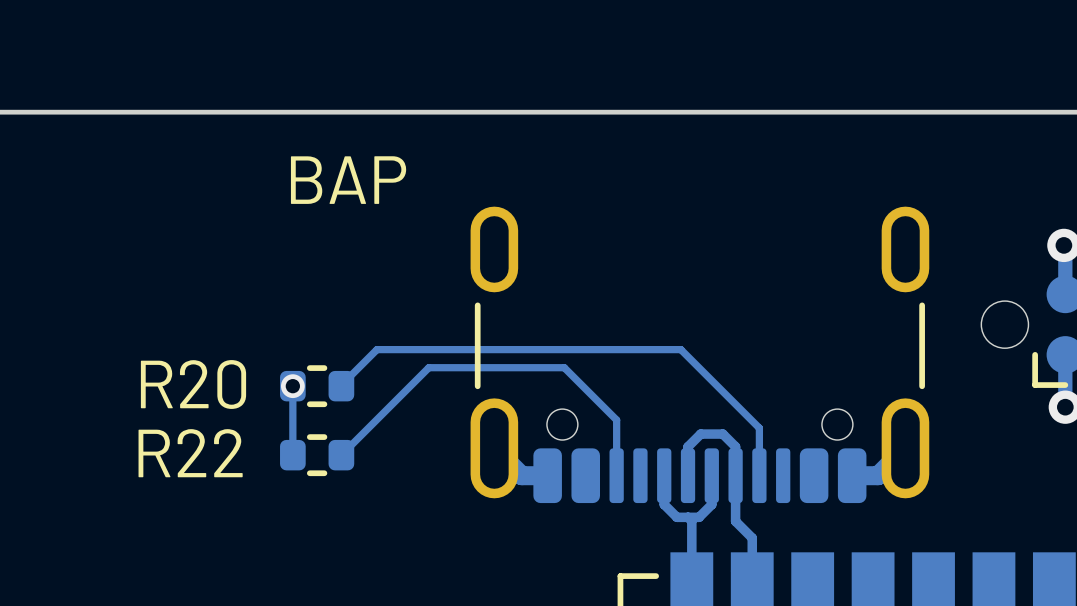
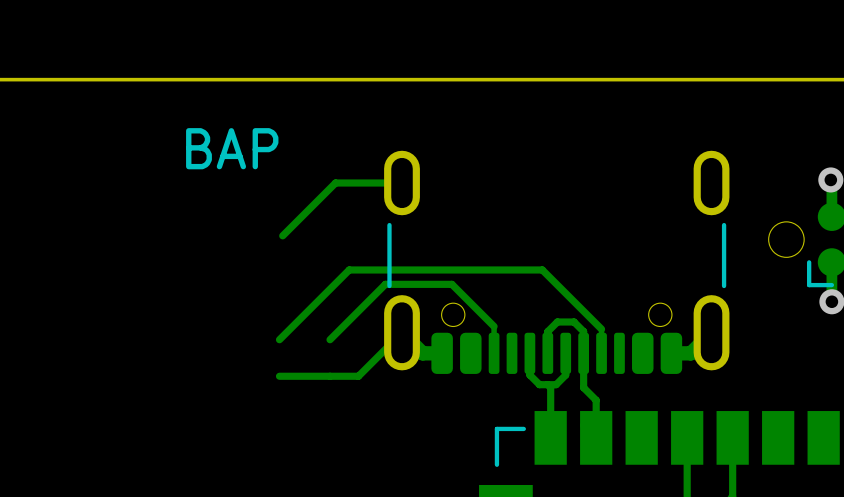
text position: BAP (348, 180) -> BAP (232, 148)
track: none -> (402, 183) (335, 183) (282, 235)
track: (292, 386) (292, 455) -> none
via: (292, 386) -> none
R20: (317, 386) -> none
track: (340, 386) (376, 349) (680, 349) (759, 428) (759, 443) -> (279, 339) (349, 269) (542, 269) (601, 329)
track: (616, 440) (616, 420) (564, 367) (428, 367) (341, 455) -> (494, 326) (451, 284) (385, 284) (330, 339)
track: none -> (402, 332) (358, 376) (279, 376)
R22: (317, 455) -> none

